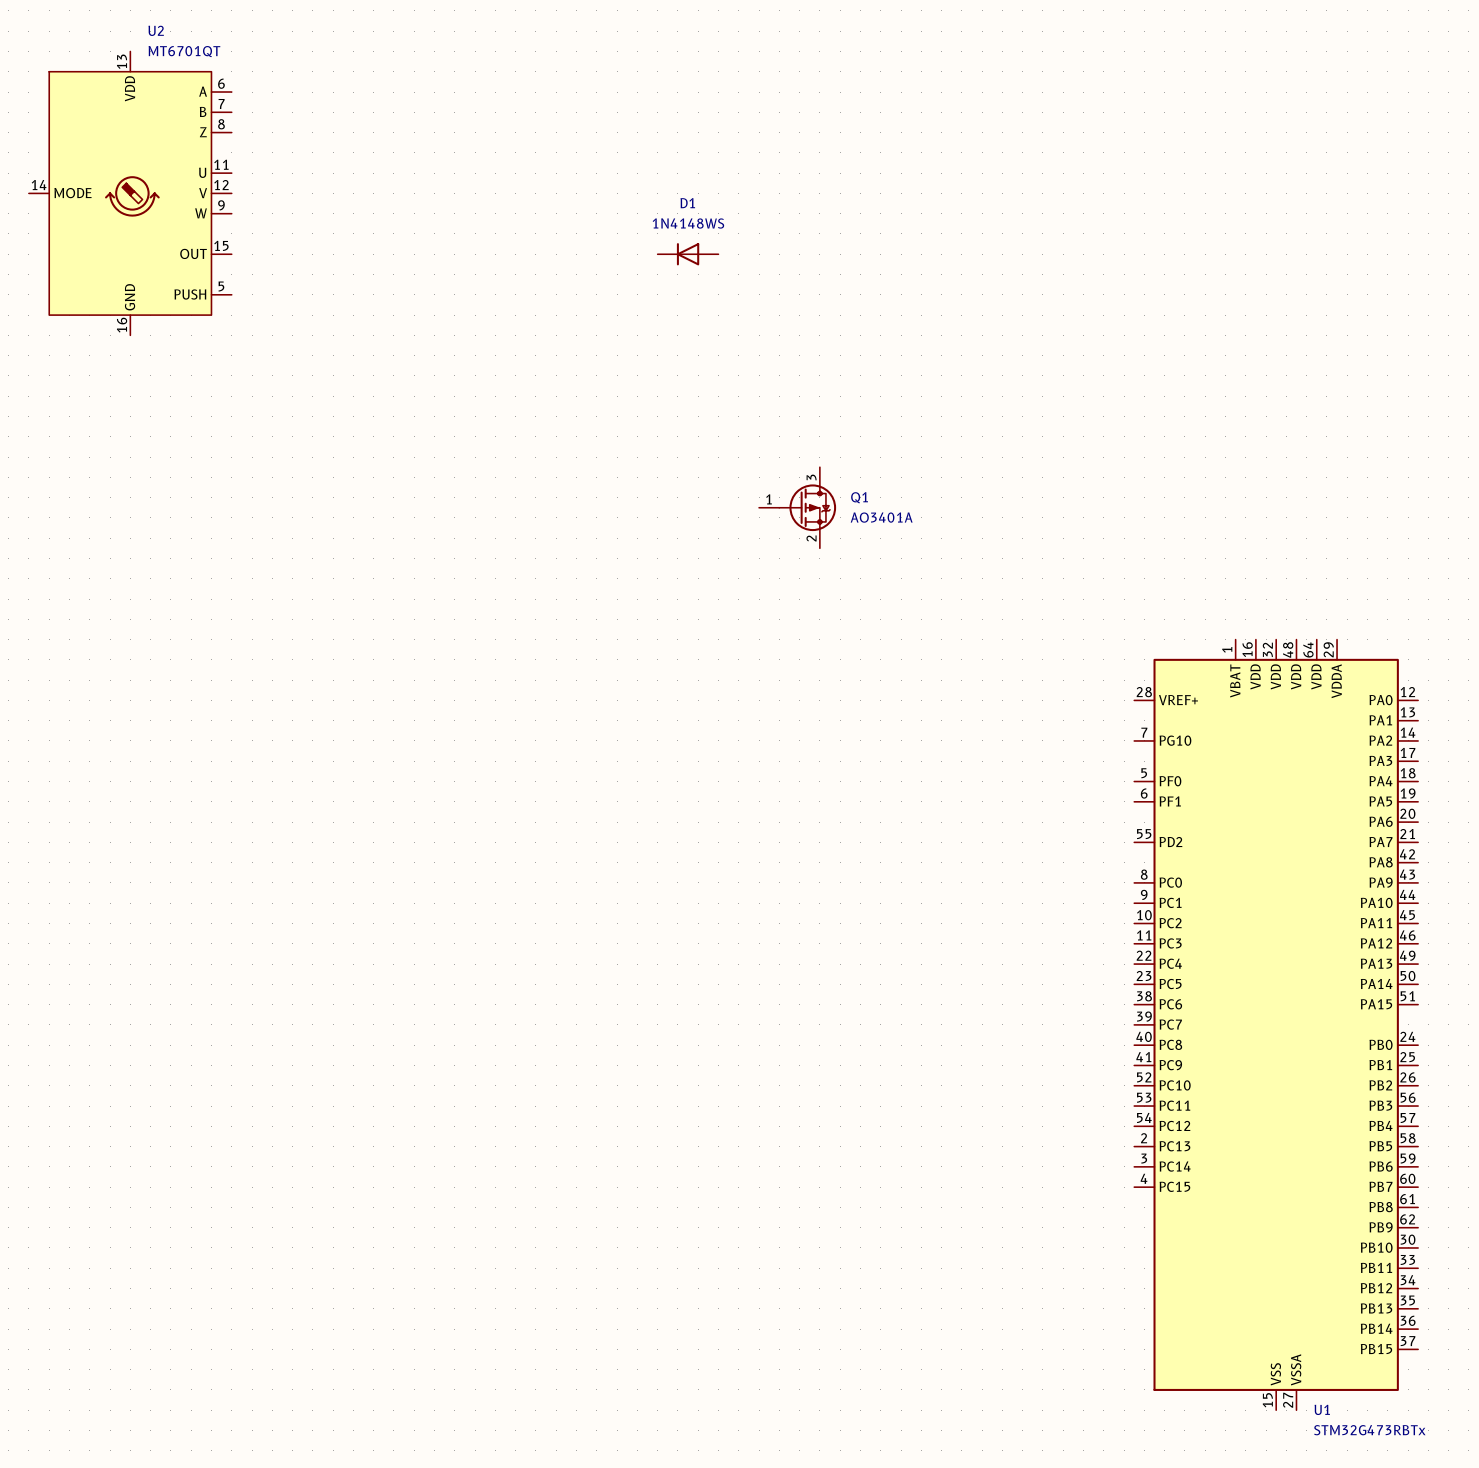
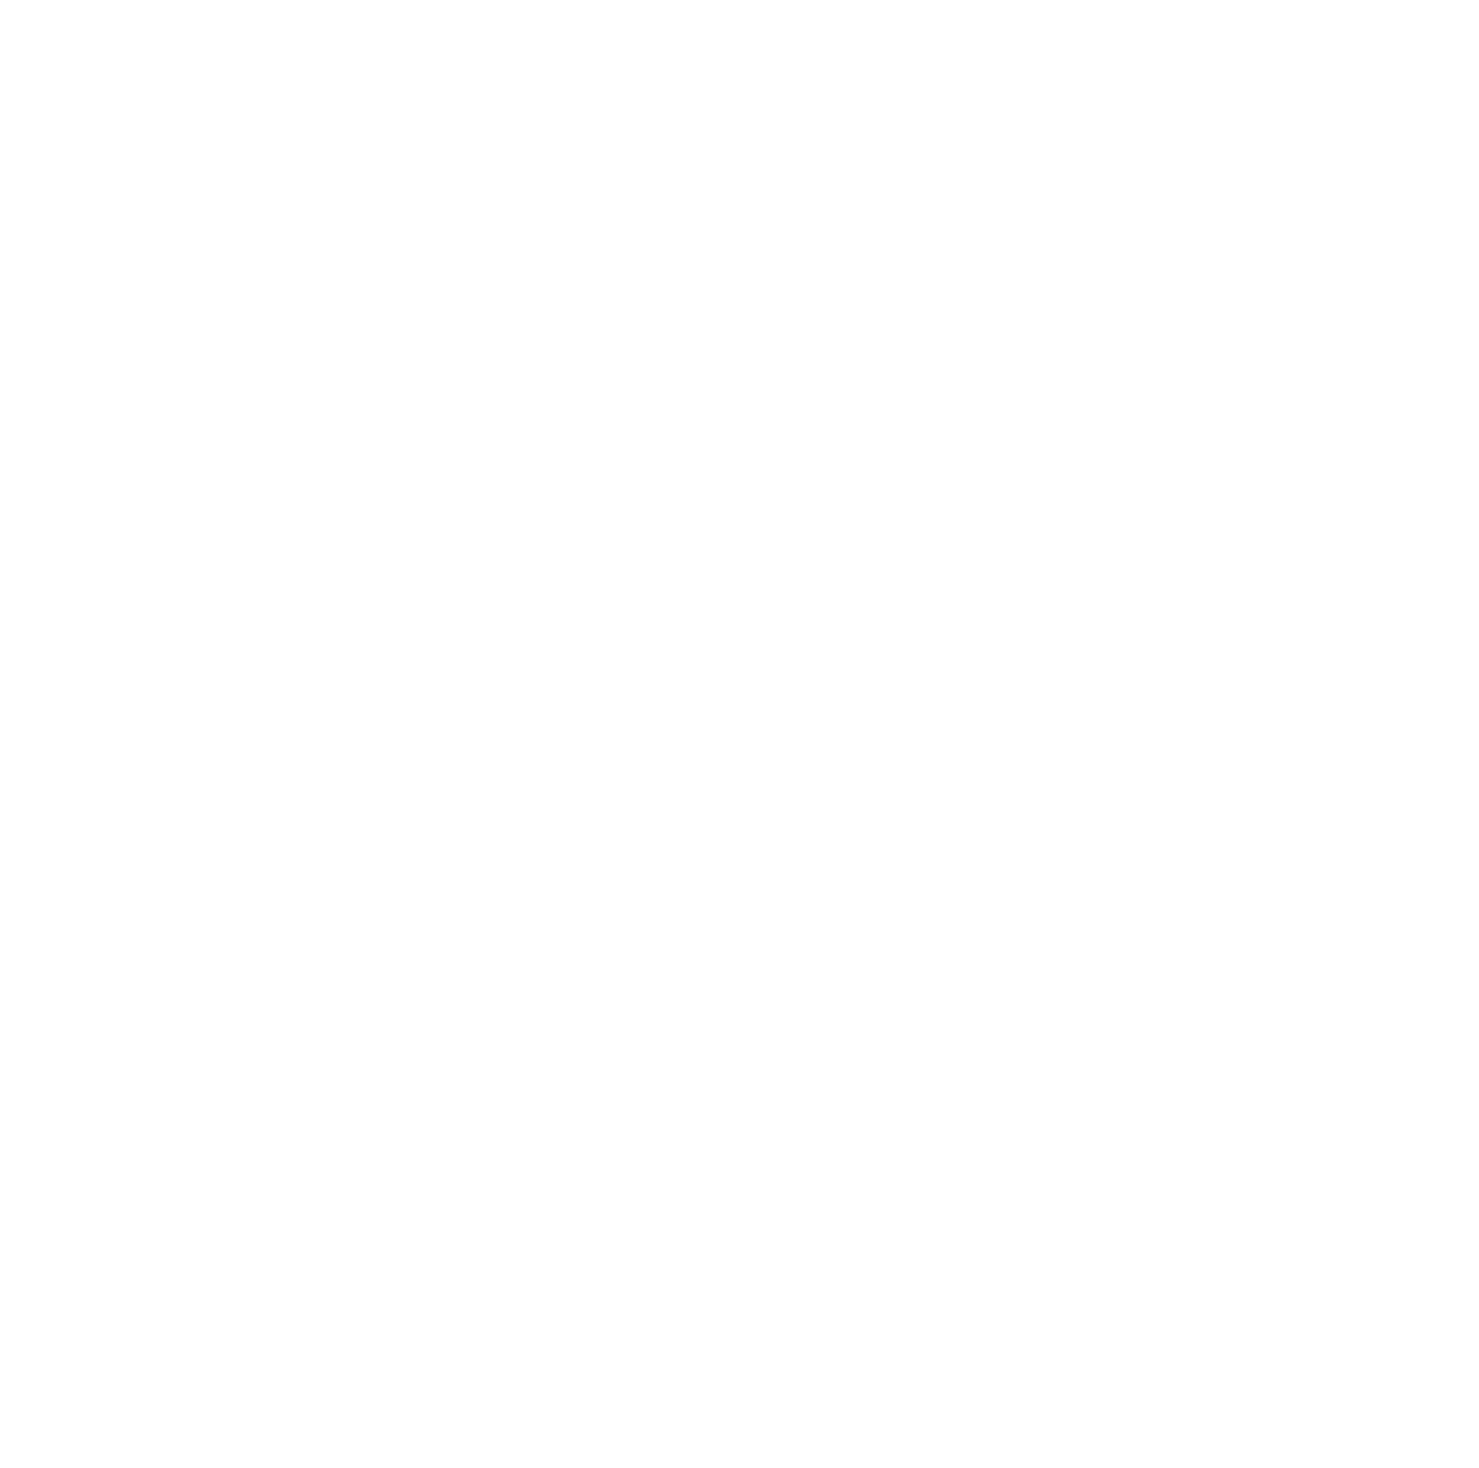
U2: MT6701QT (130, 193) -> none
D1: 1N4148WS (688, 254) -> none
Q1: AO3401A (797, 507) -> none
U1: STM32G473RBTx (1276, 1024) -> none

